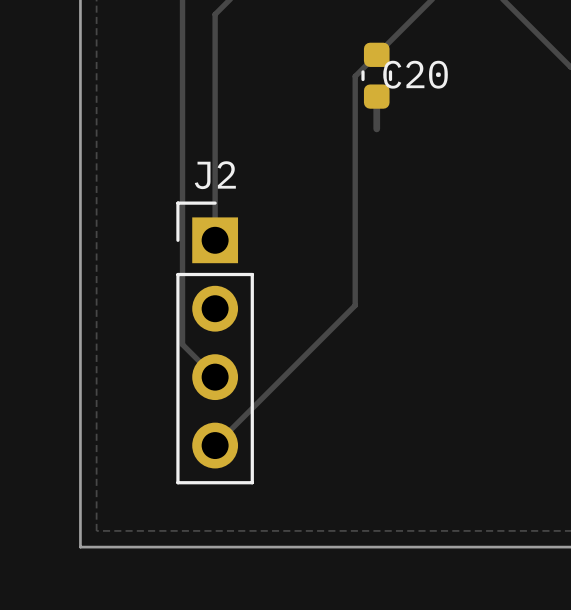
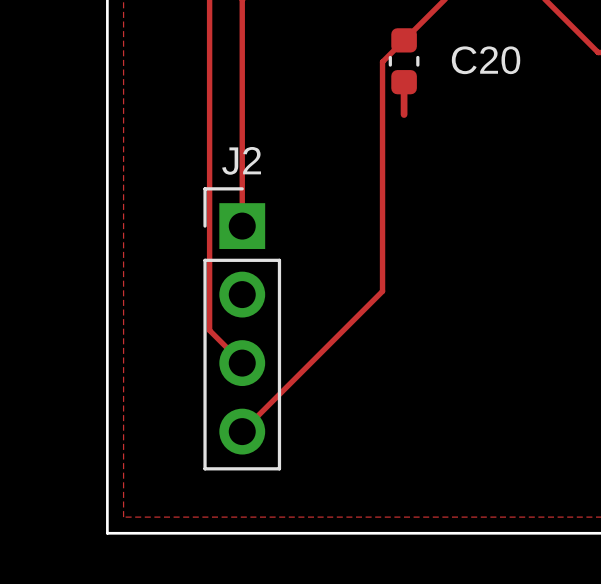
C20 name position: C20 (415, 74) -> C20 (486, 60)

